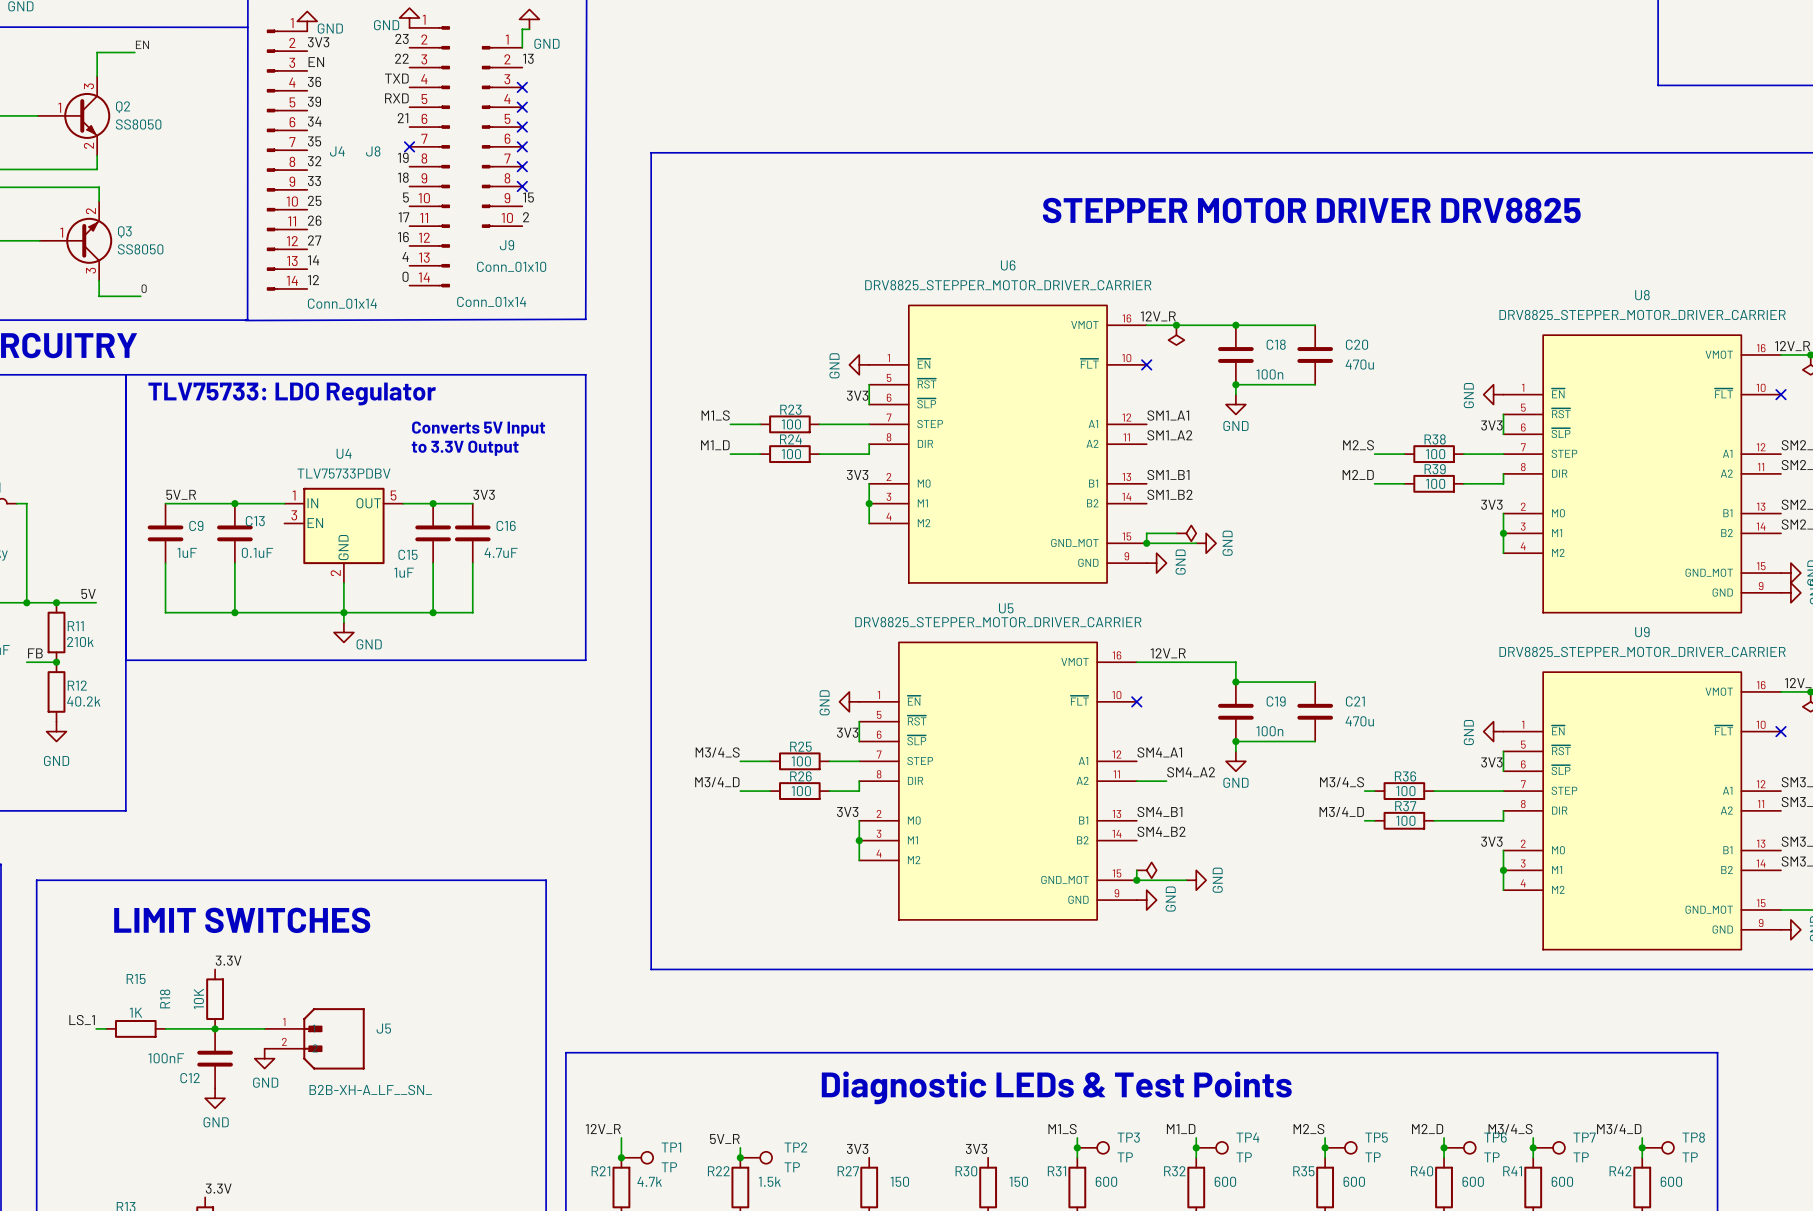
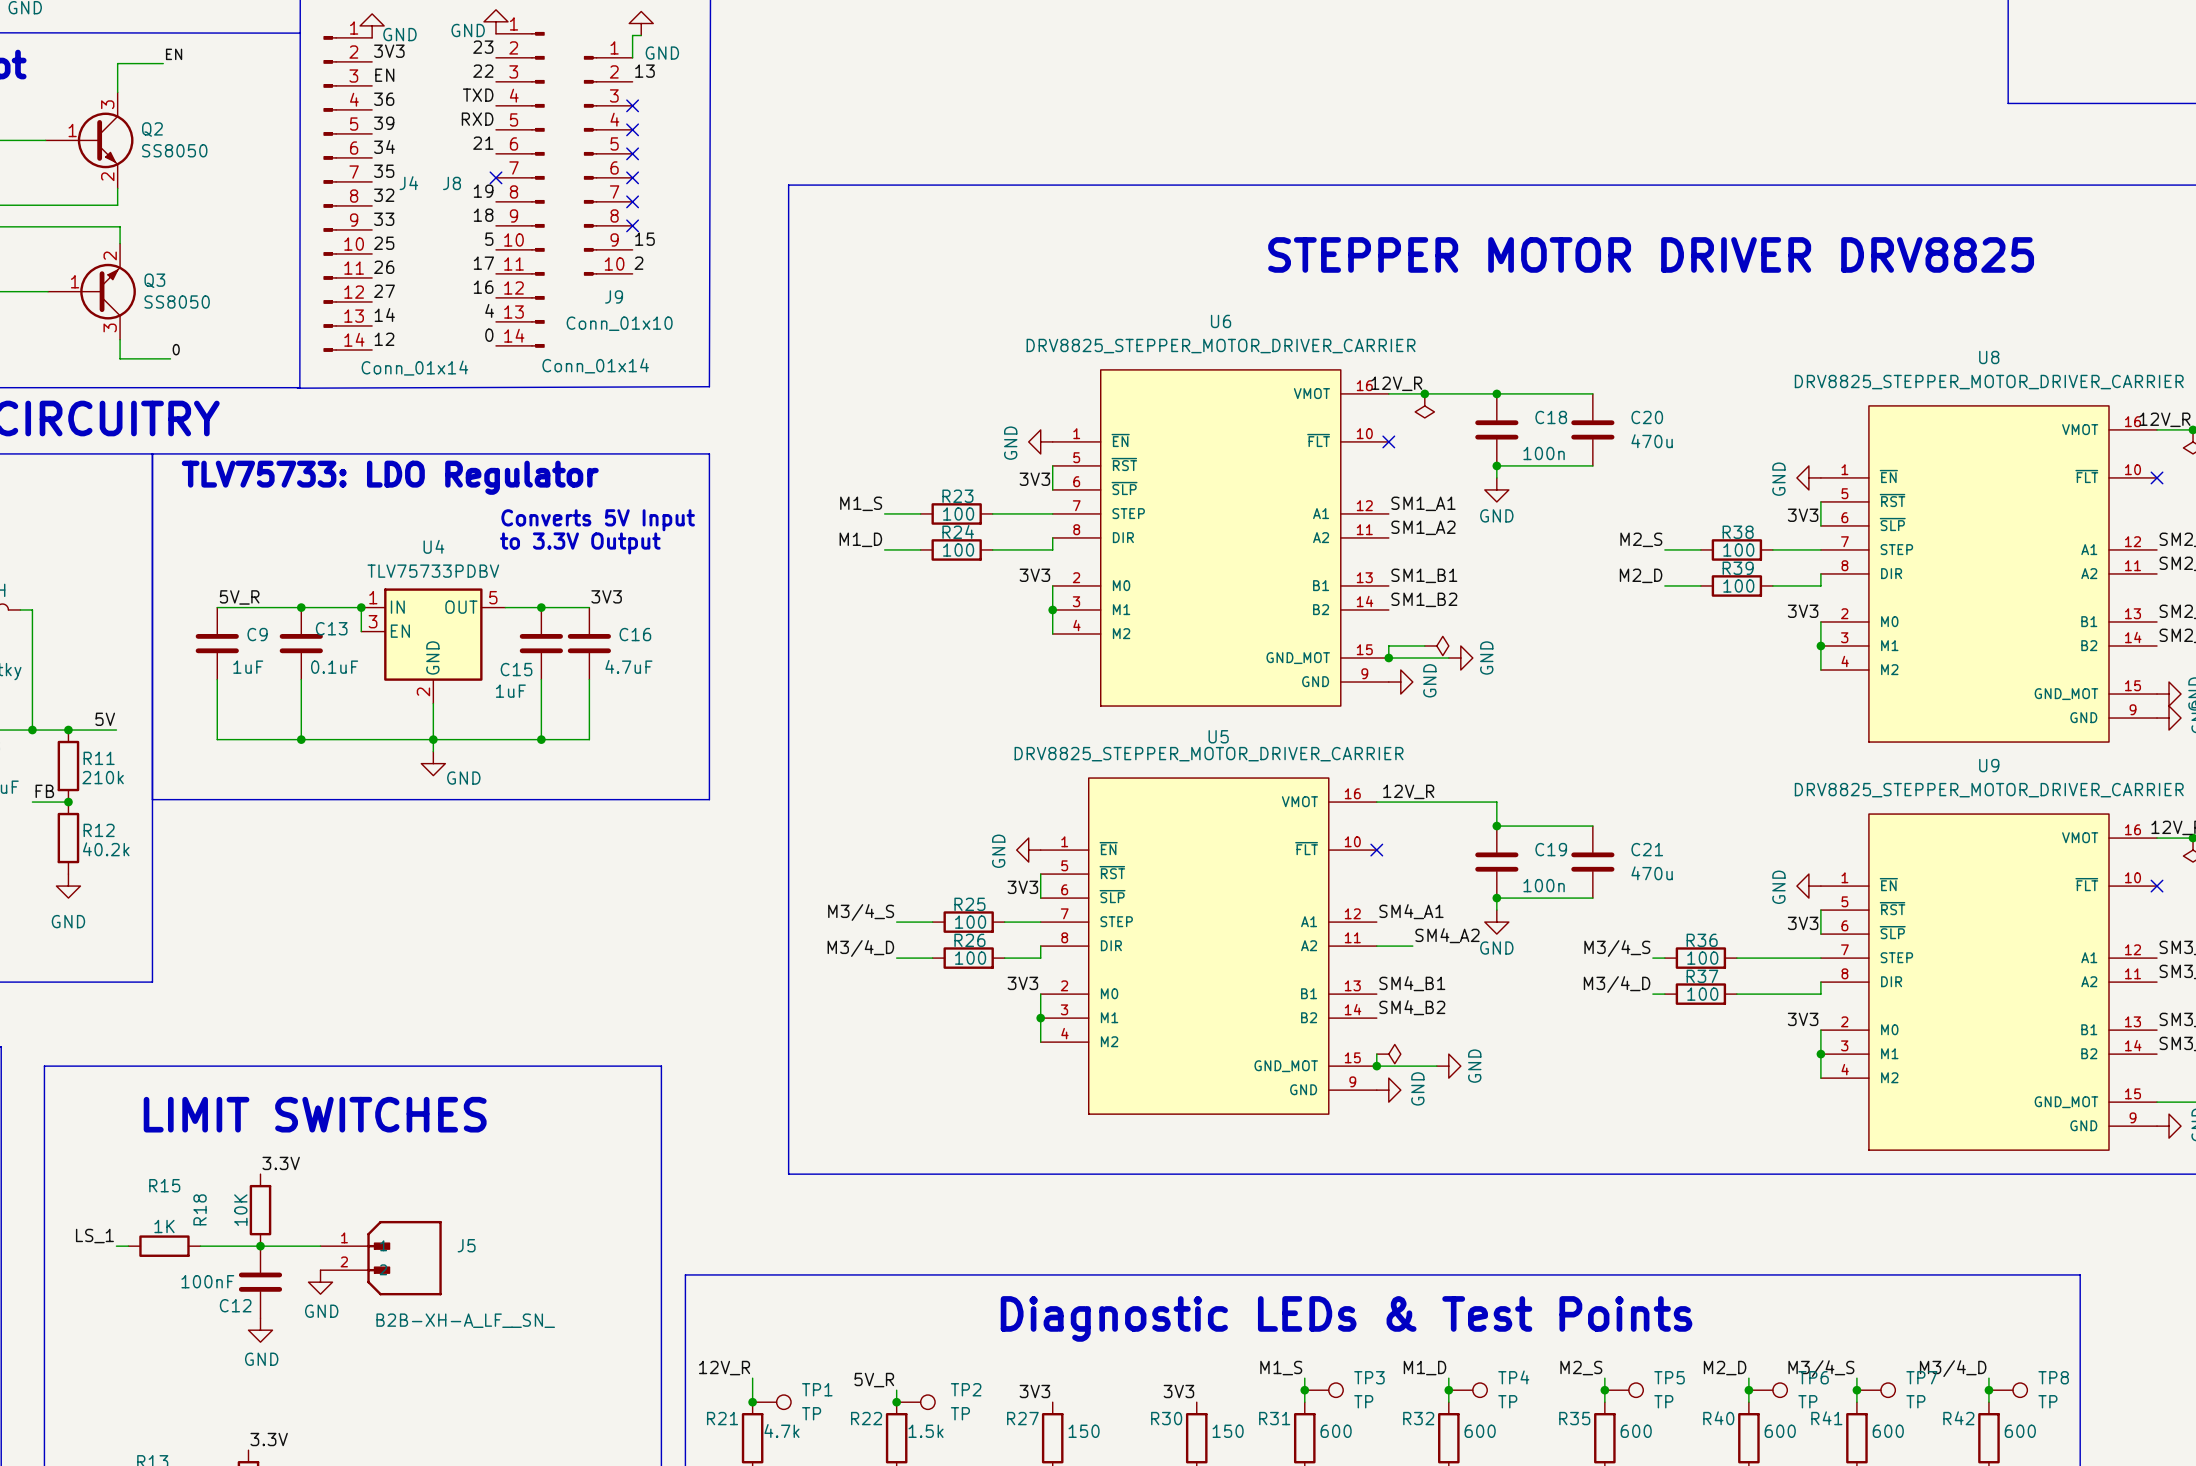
label position: 5V_R (181, 494) -> 5V_R (239, 597)
label position: 3V3 (484, 494) -> 3V3 (606, 596)
wire: none -> (217, 607) (361, 607) (361, 631)
junction: none -> (361, 607)
wire: (165, 503) (284, 503) -> none
junction position: (234, 503) -> (301, 607)
wire: (403, 503) (472, 503) -> (505, 607) (589, 607)
junction position: (433, 503) -> (541, 607)
C9 position: (165, 533) -> (217, 643)
C13 position: (234, 533) -> (301, 643)
C15 position: (433, 533) -> (541, 643)
C16 position: (472, 533) -> (589, 643)
U4 position: (343, 535) -> (433, 645)
wire: (165, 563) (165, 612) (472, 612) (472, 563) -> (217, 679) (217, 739) (589, 739) (589, 679)
wire: (234, 563) (234, 612) -> (301, 679) (301, 739)
wire: (433, 563) (433, 612) -> (541, 679) (541, 739)
wire: (343, 582) (343, 622) -> (433, 703) (433, 751)
junction position: (234, 612) -> (301, 739)
junction position: (343, 612) -> (433, 739)
junction position: (433, 612) -> (541, 739)
power symbol position: GND (343, 632) -> GND (433, 763)

